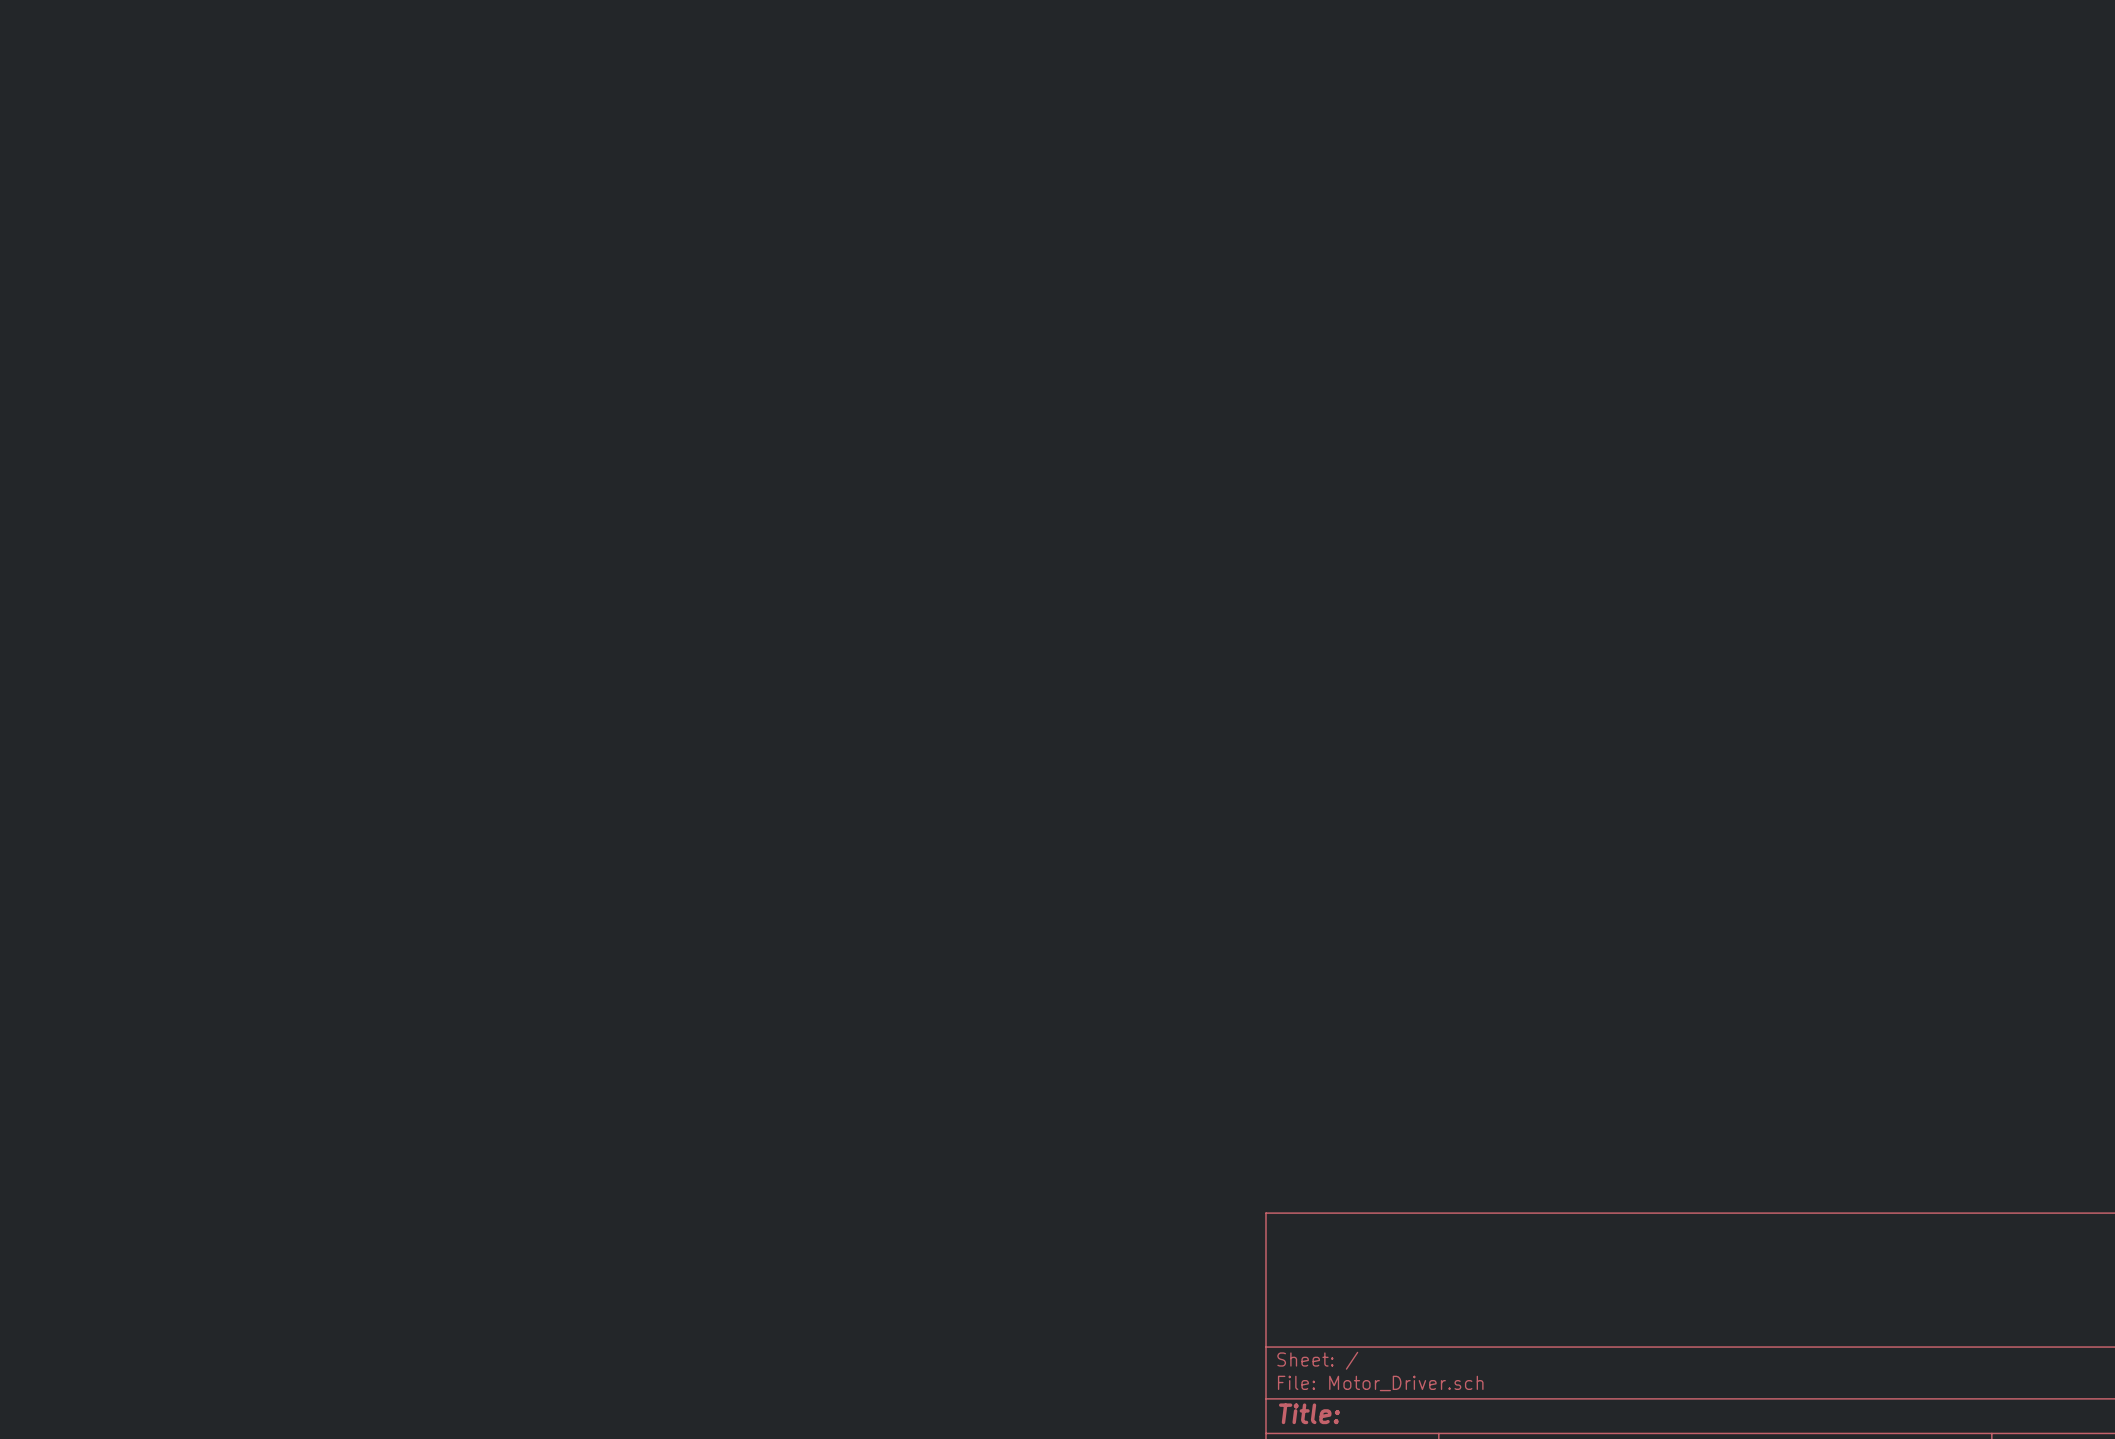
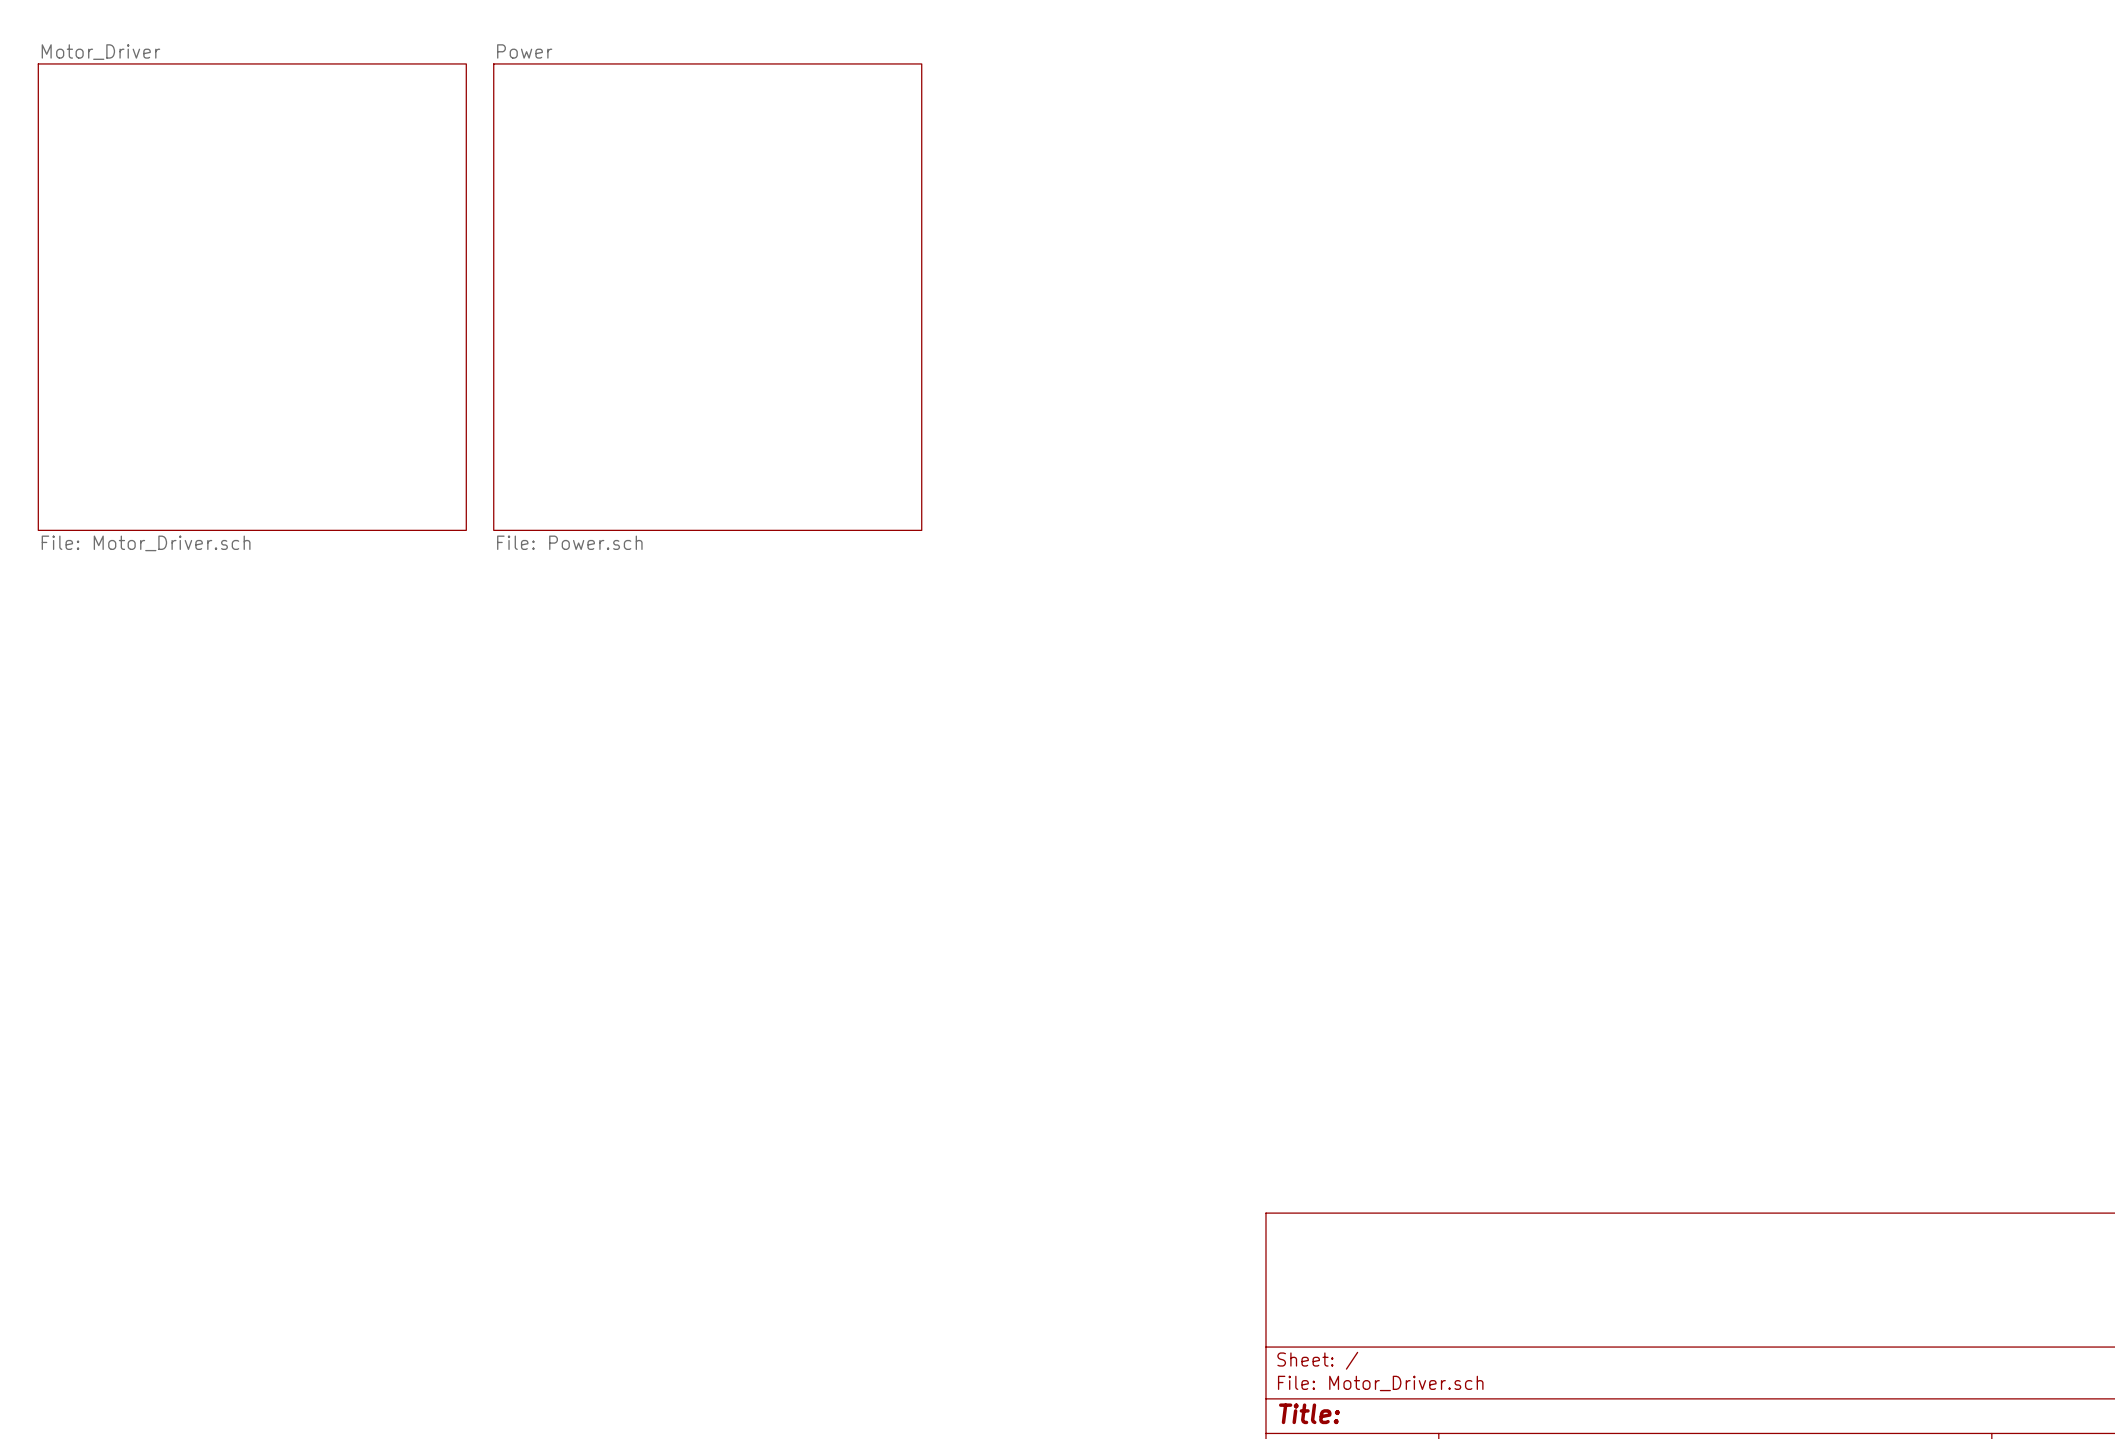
sheet Motor_Driver: none -> File: Motor_Driver.sch (252, 297)
sheet Power: none -> File: Power.sch (707, 297)

